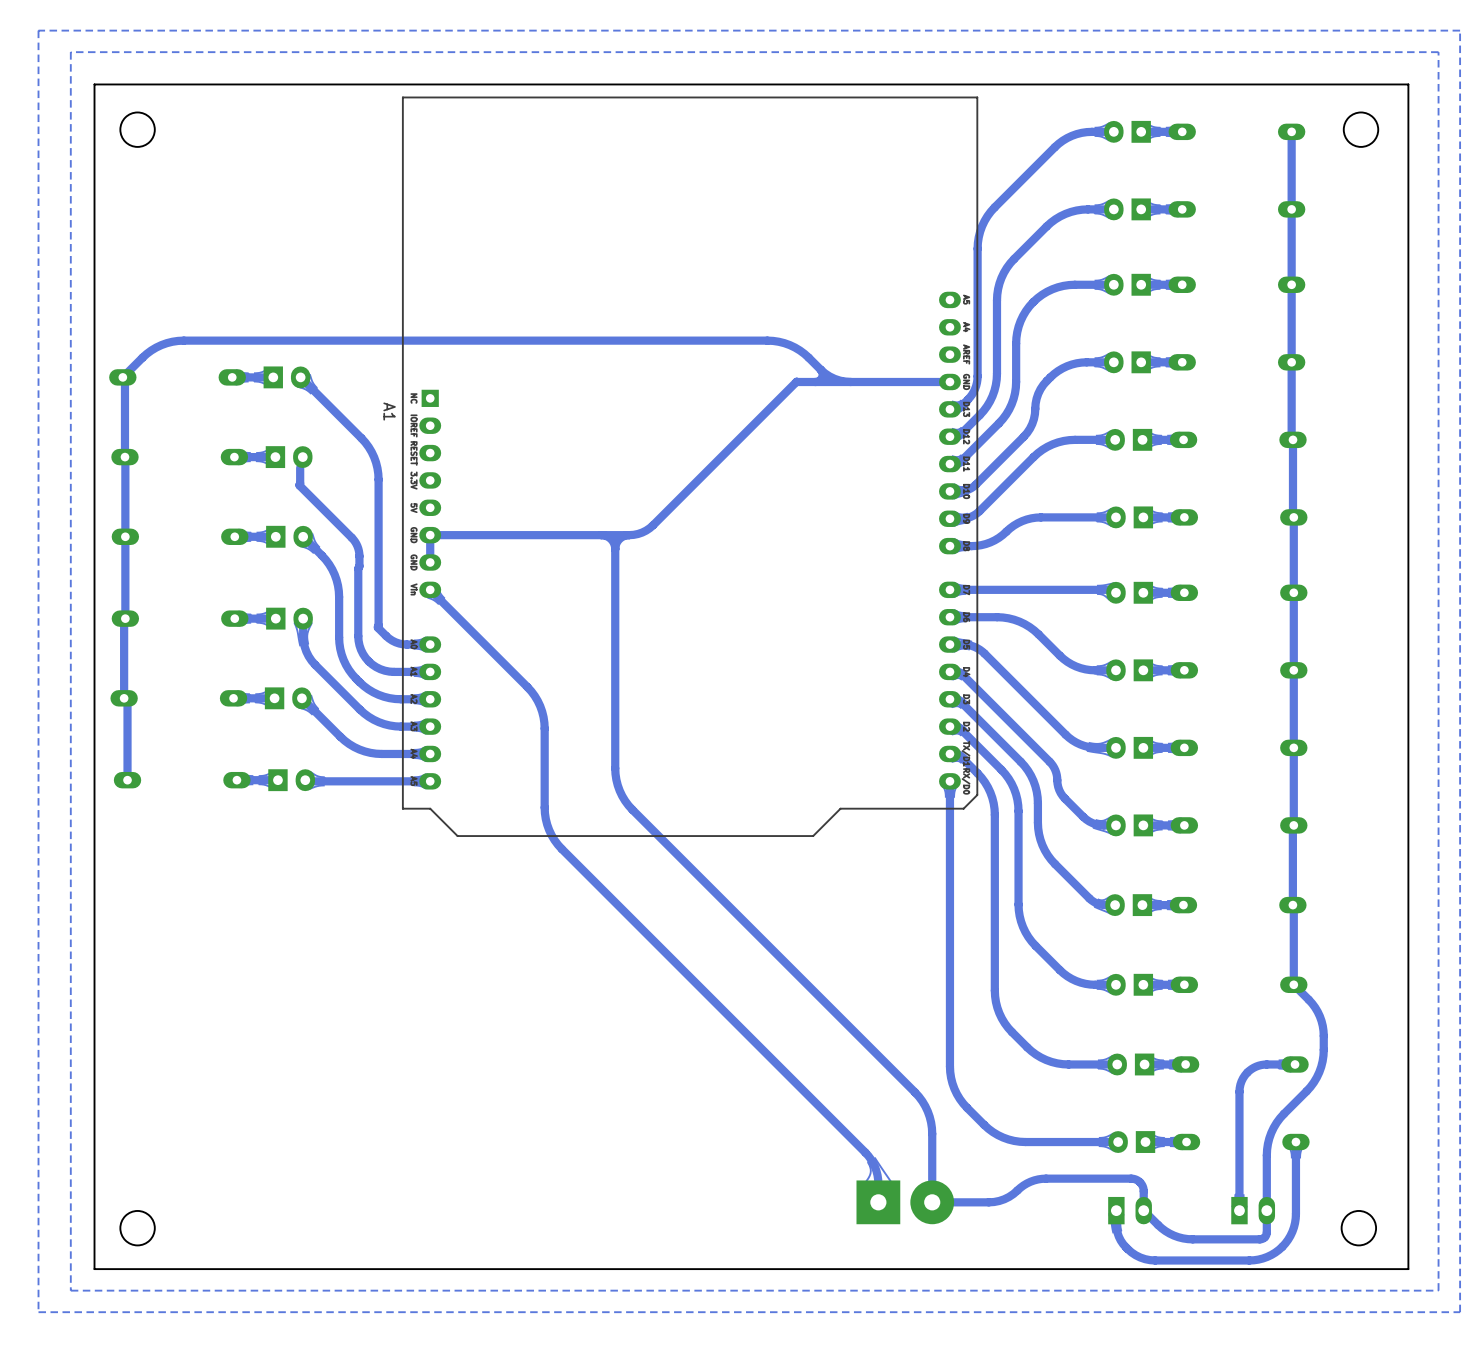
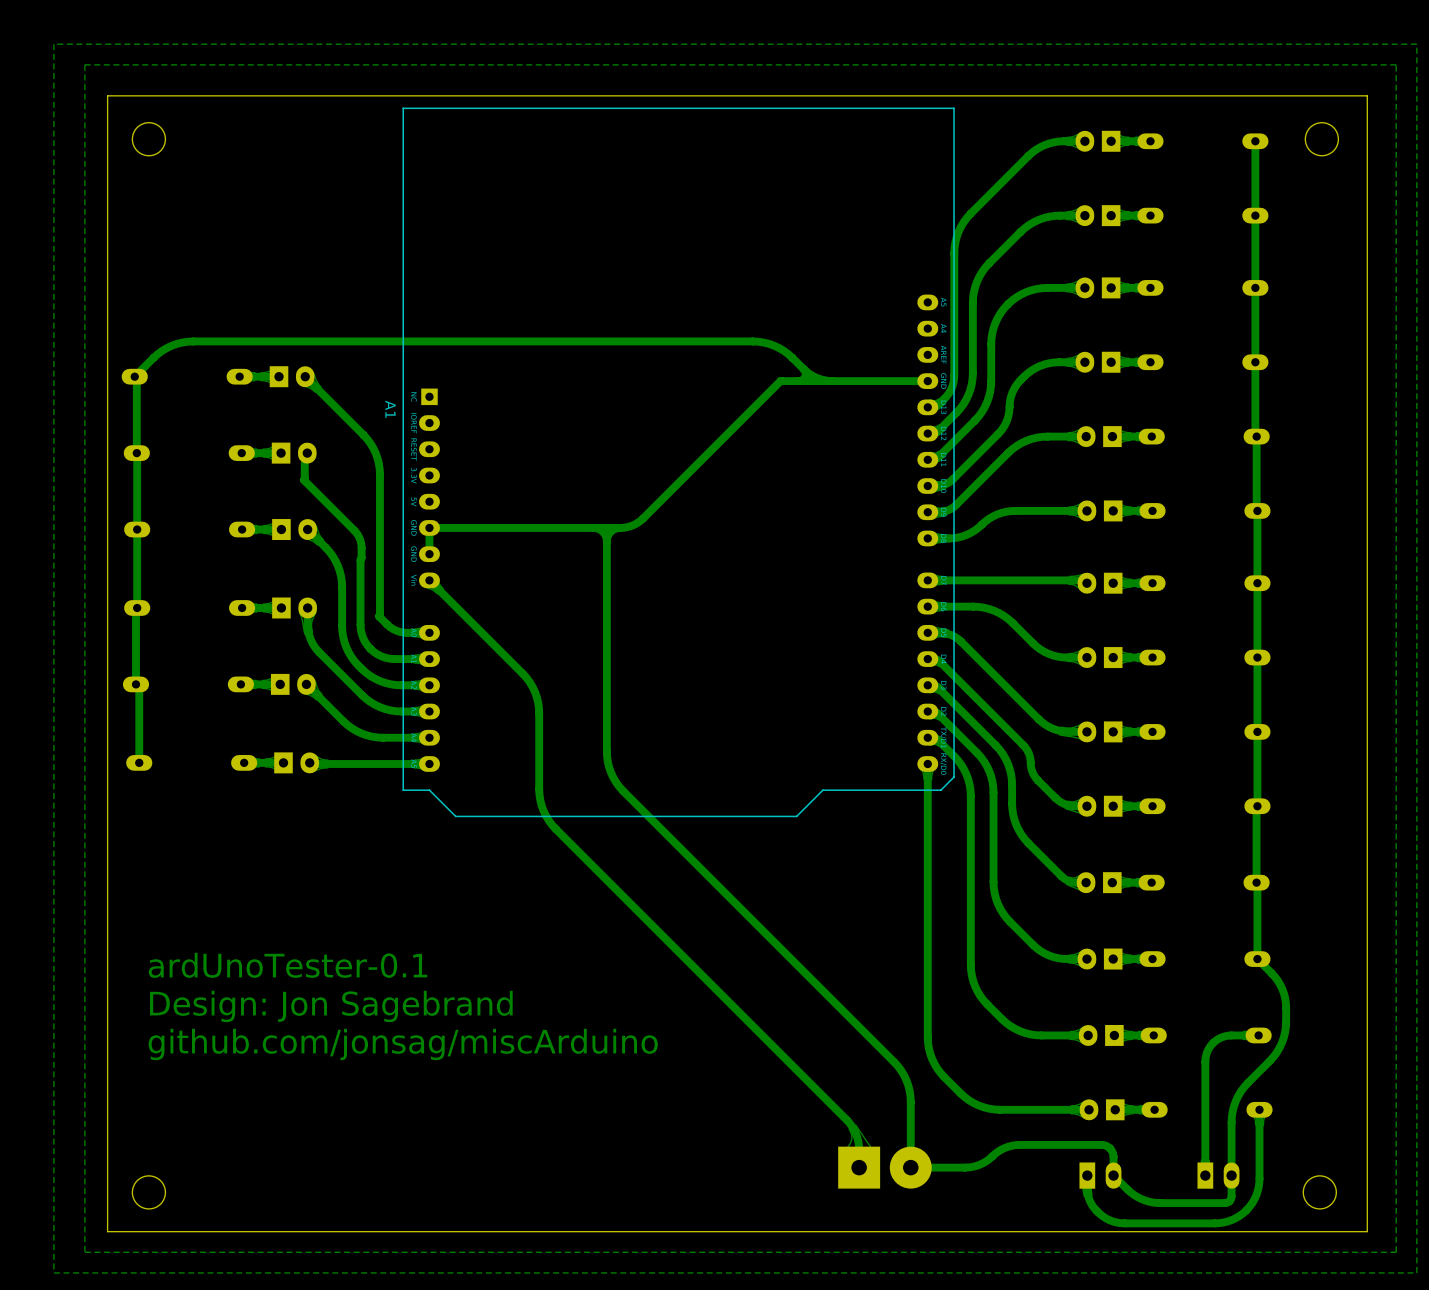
text: none -> ardUnoTester-0.1 (288, 965)
text: none -> Design: Jon Sagebrand (331, 1006)
text: none -> github.com/jonsag/miscArduino (403, 1044)

